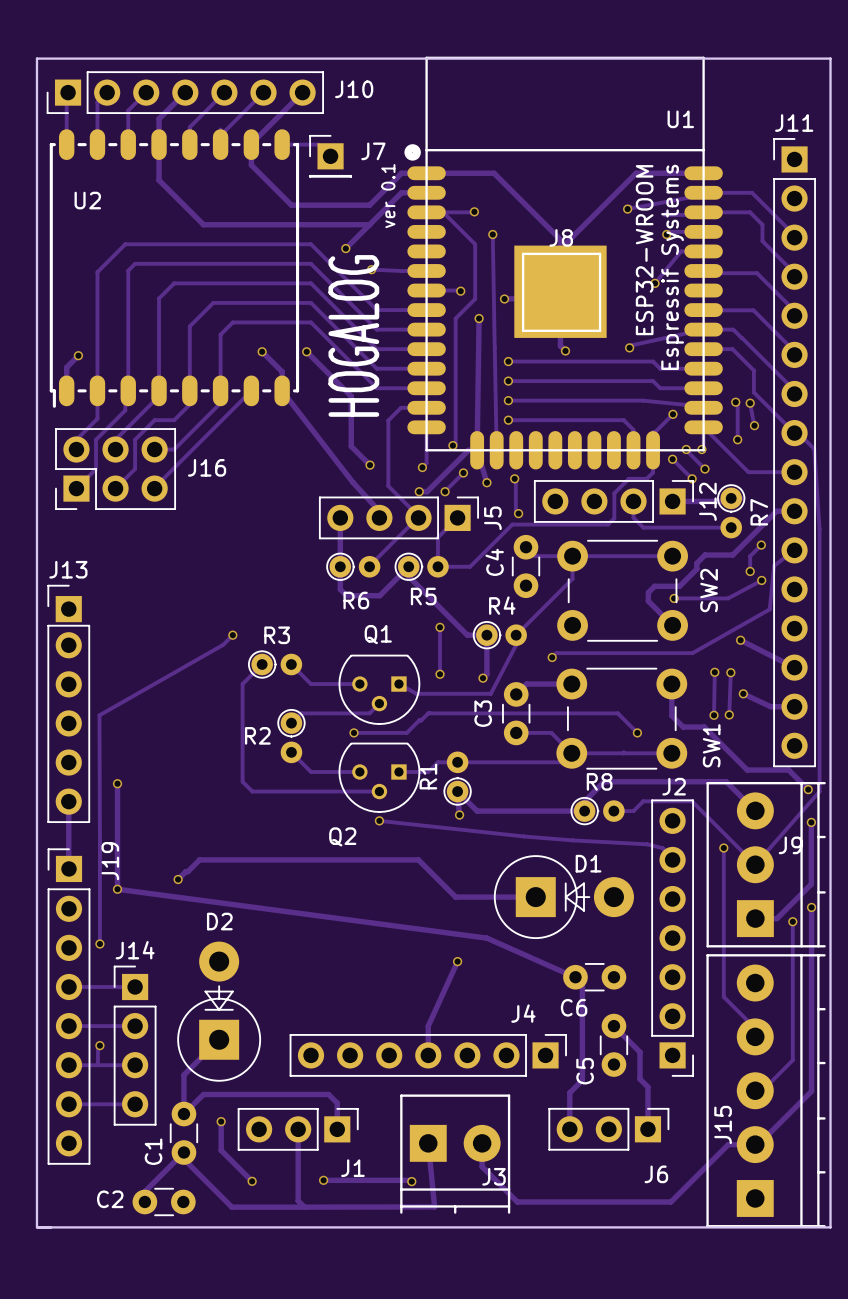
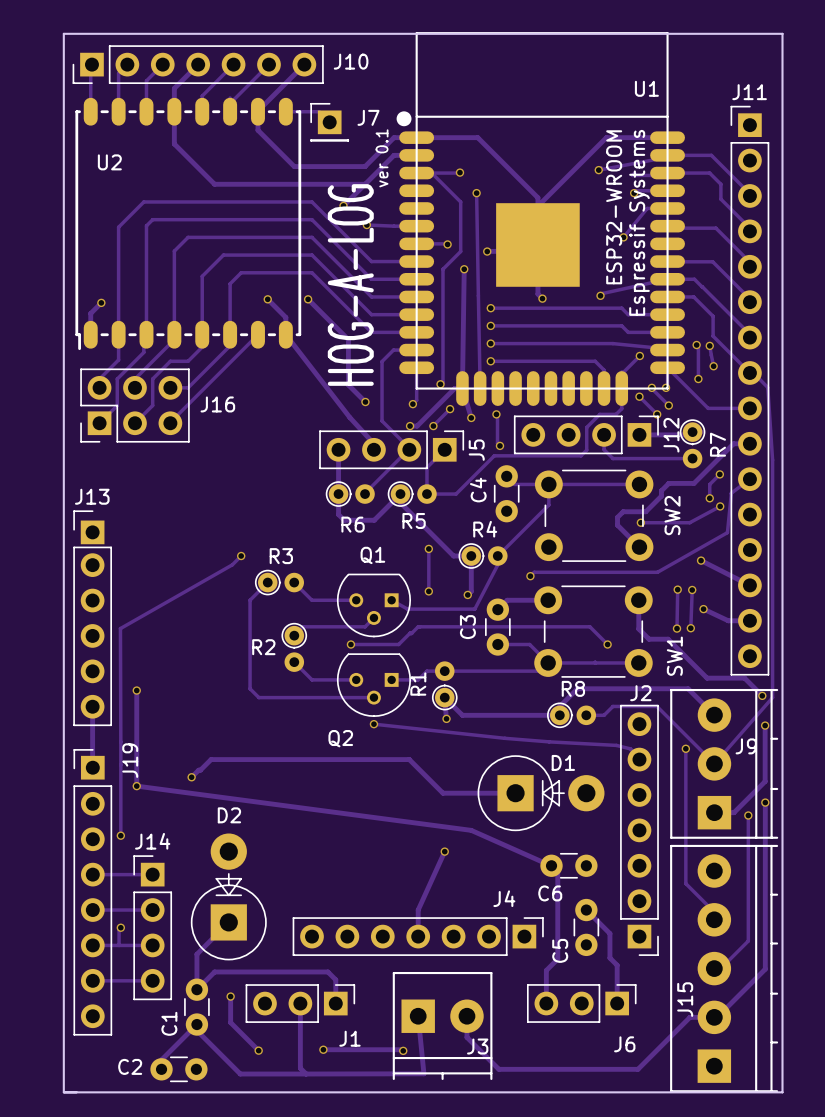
J8: (561, 292) -> none
text: HOGALOG (353, 335) -> HOG-A-LOG (350, 285)

